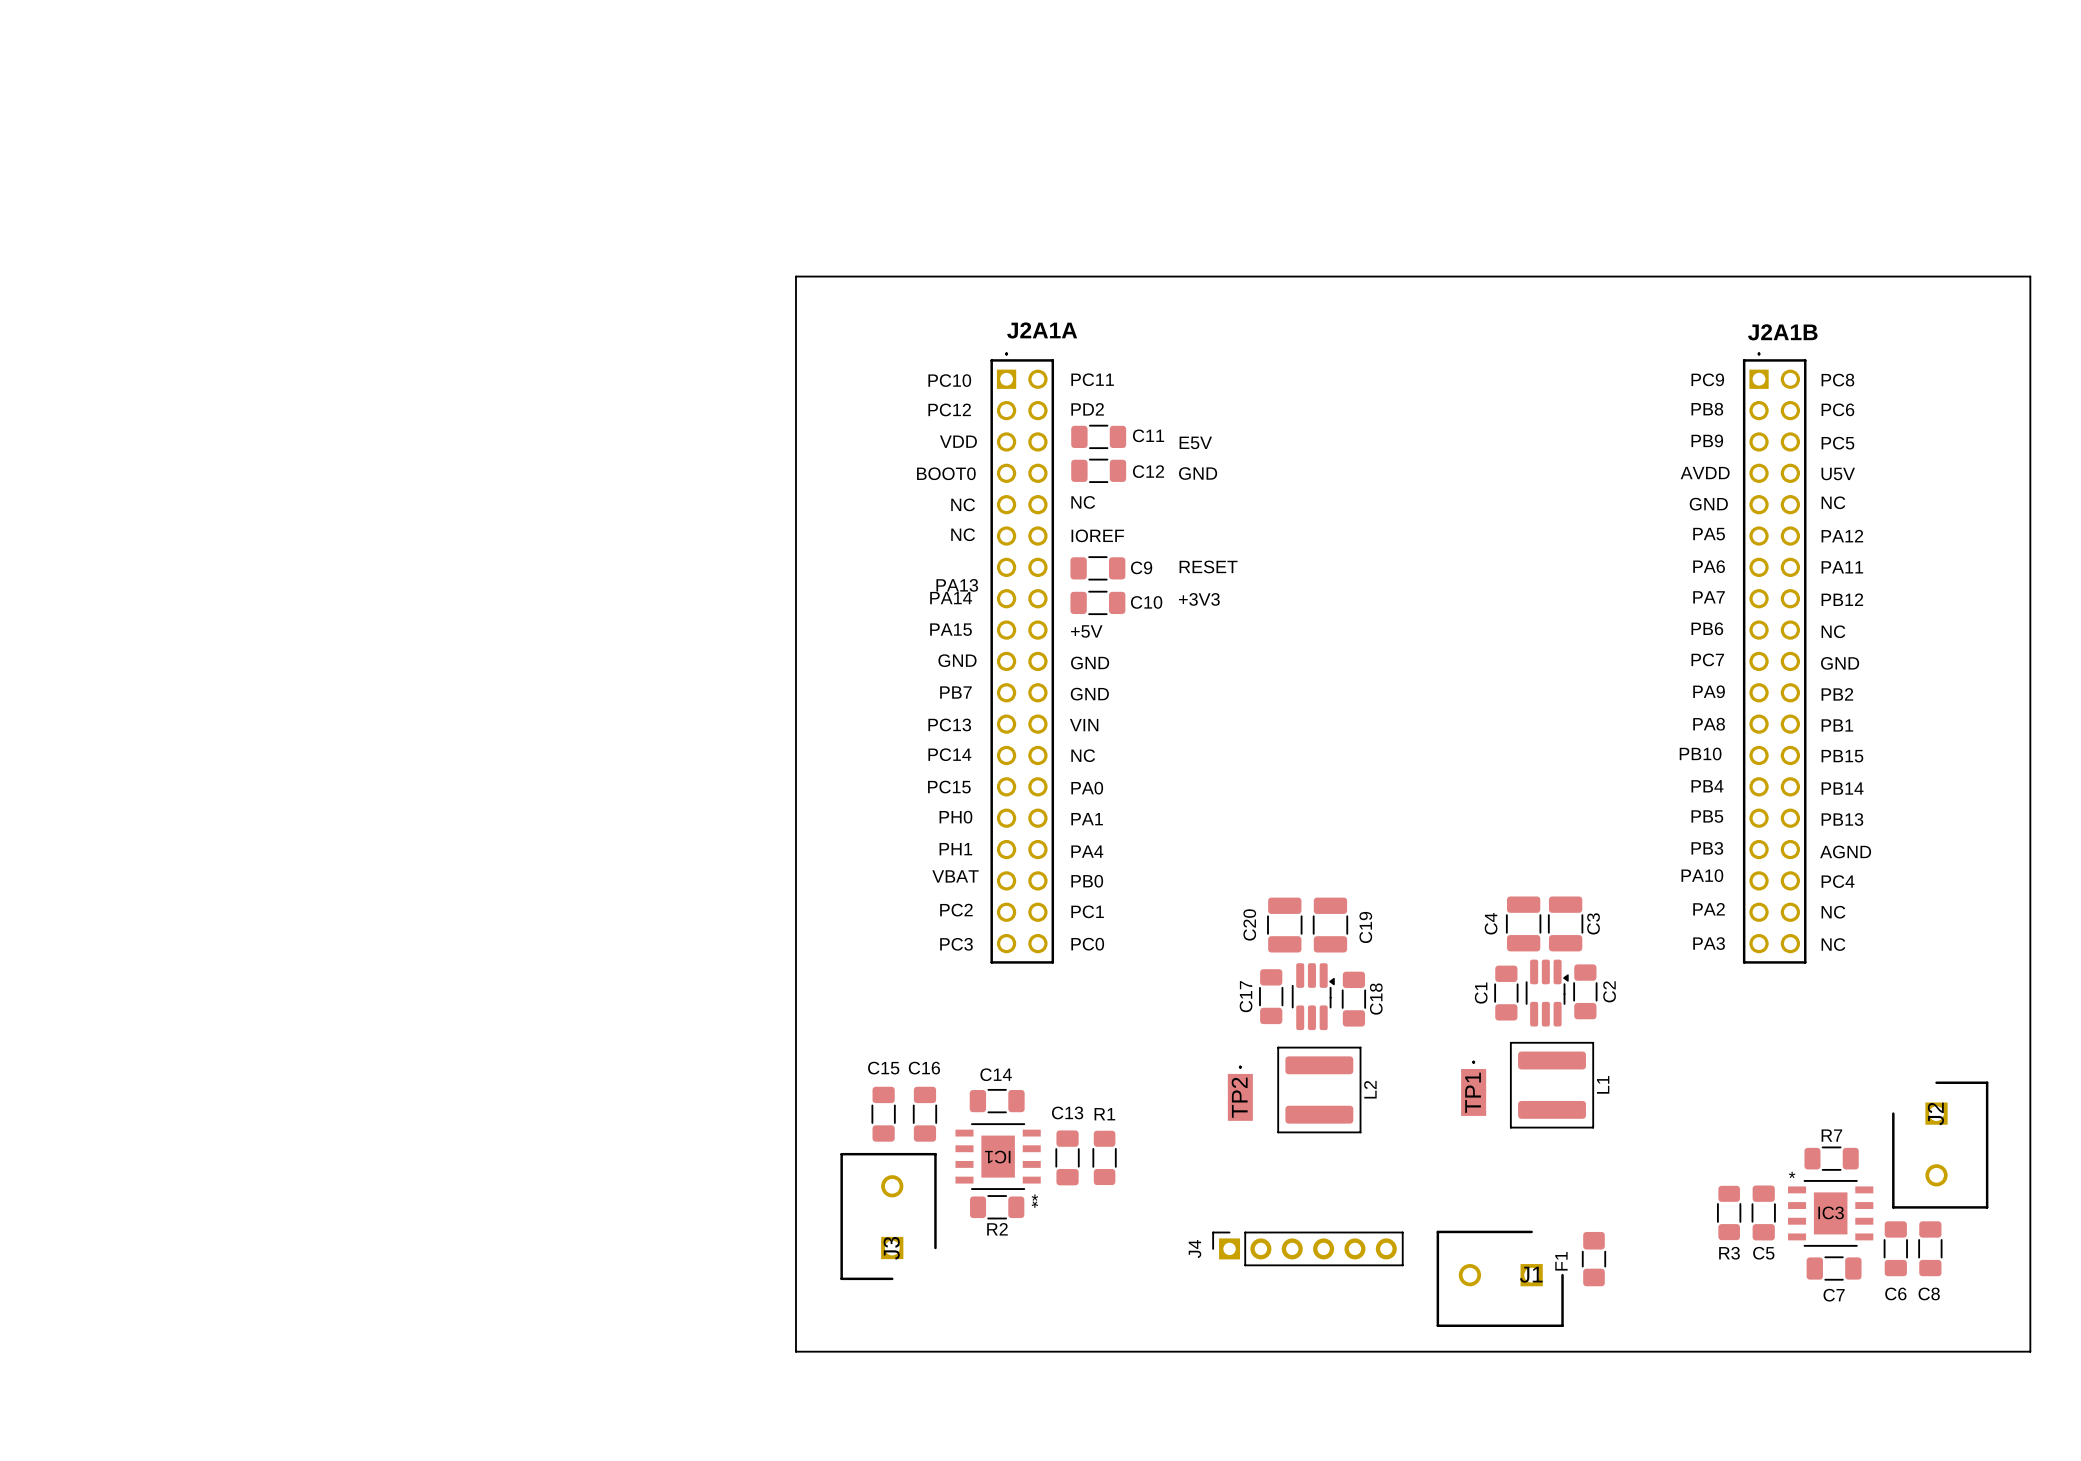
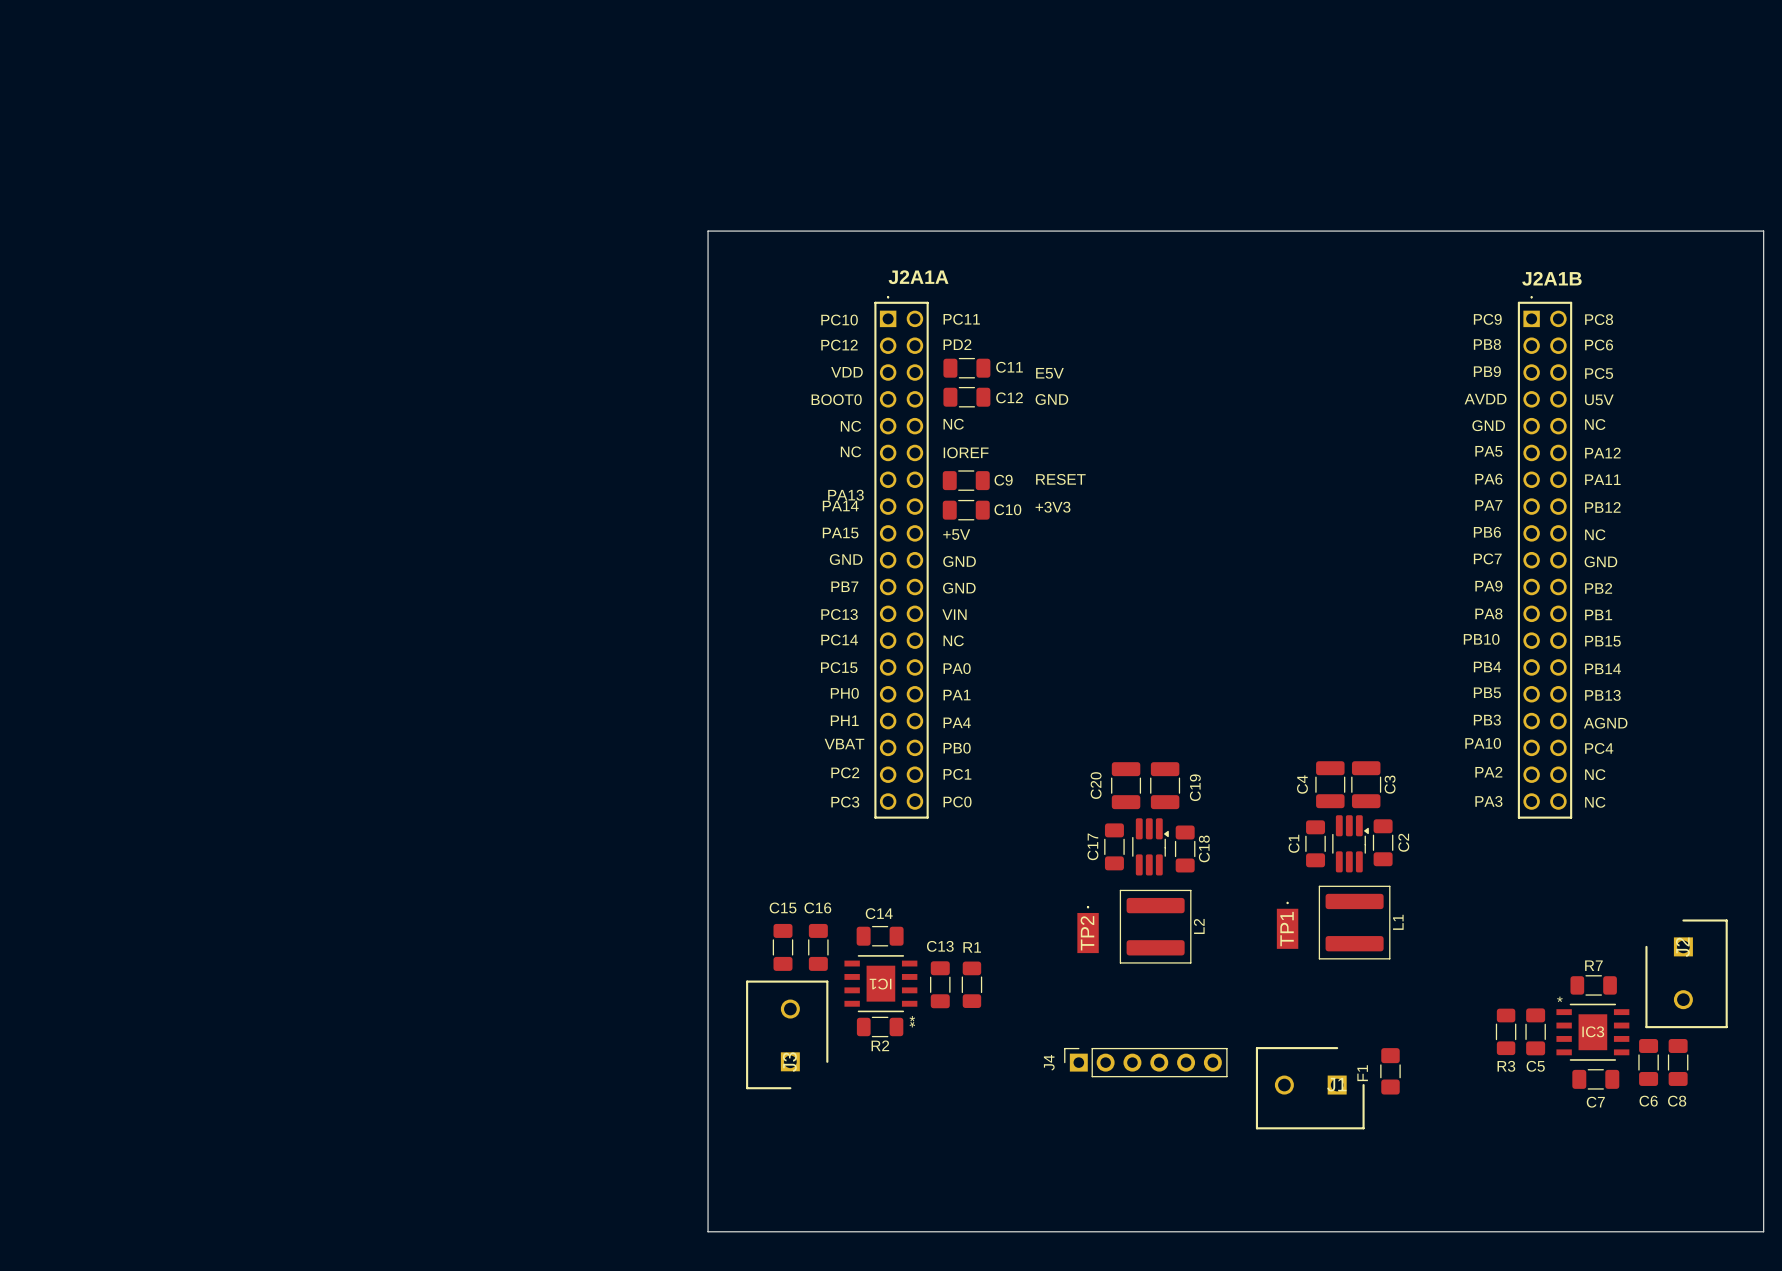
board edge: (795, 1351) (2030, 1351) -> (708, 1150) (708, 1231) (1763, 1231) (1763, 1150)

